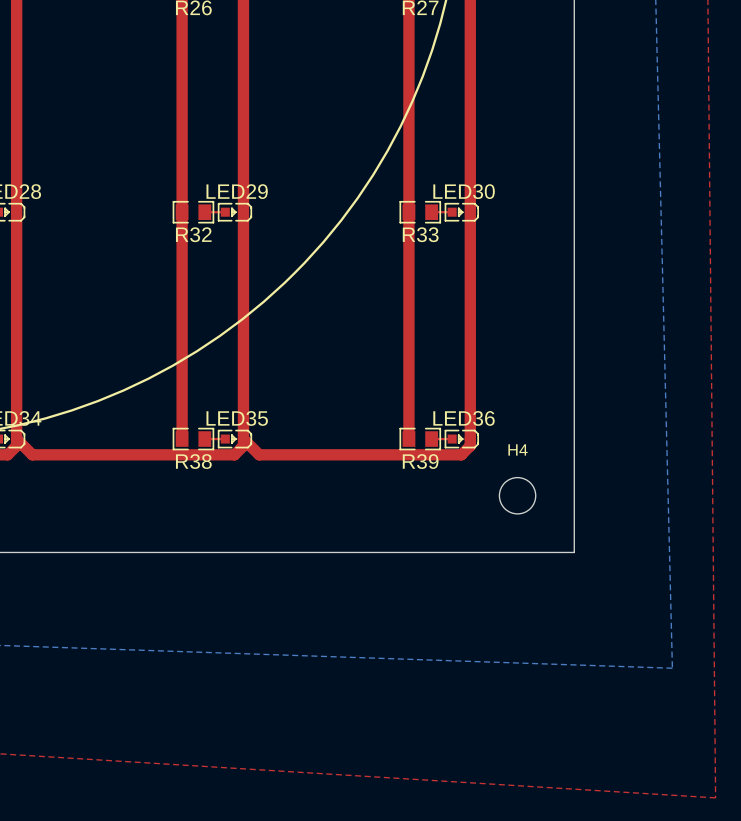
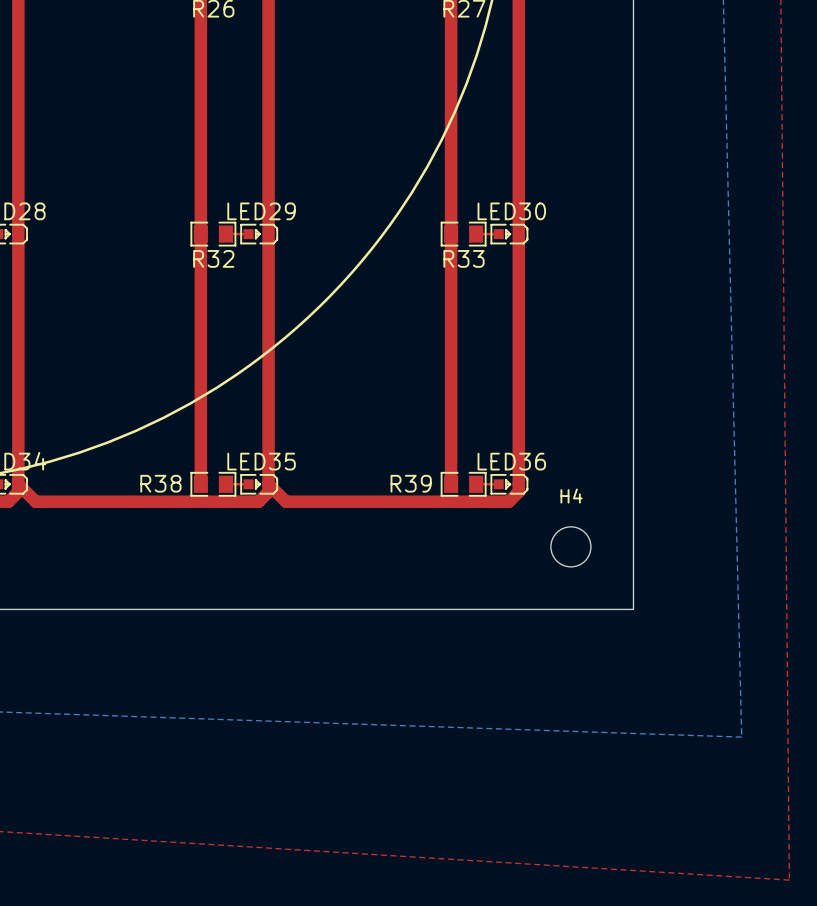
R38 name position: R38 (193, 461) -> R38 (160, 483)
R39 name position: R39 (420, 461) -> R39 (411, 483)

